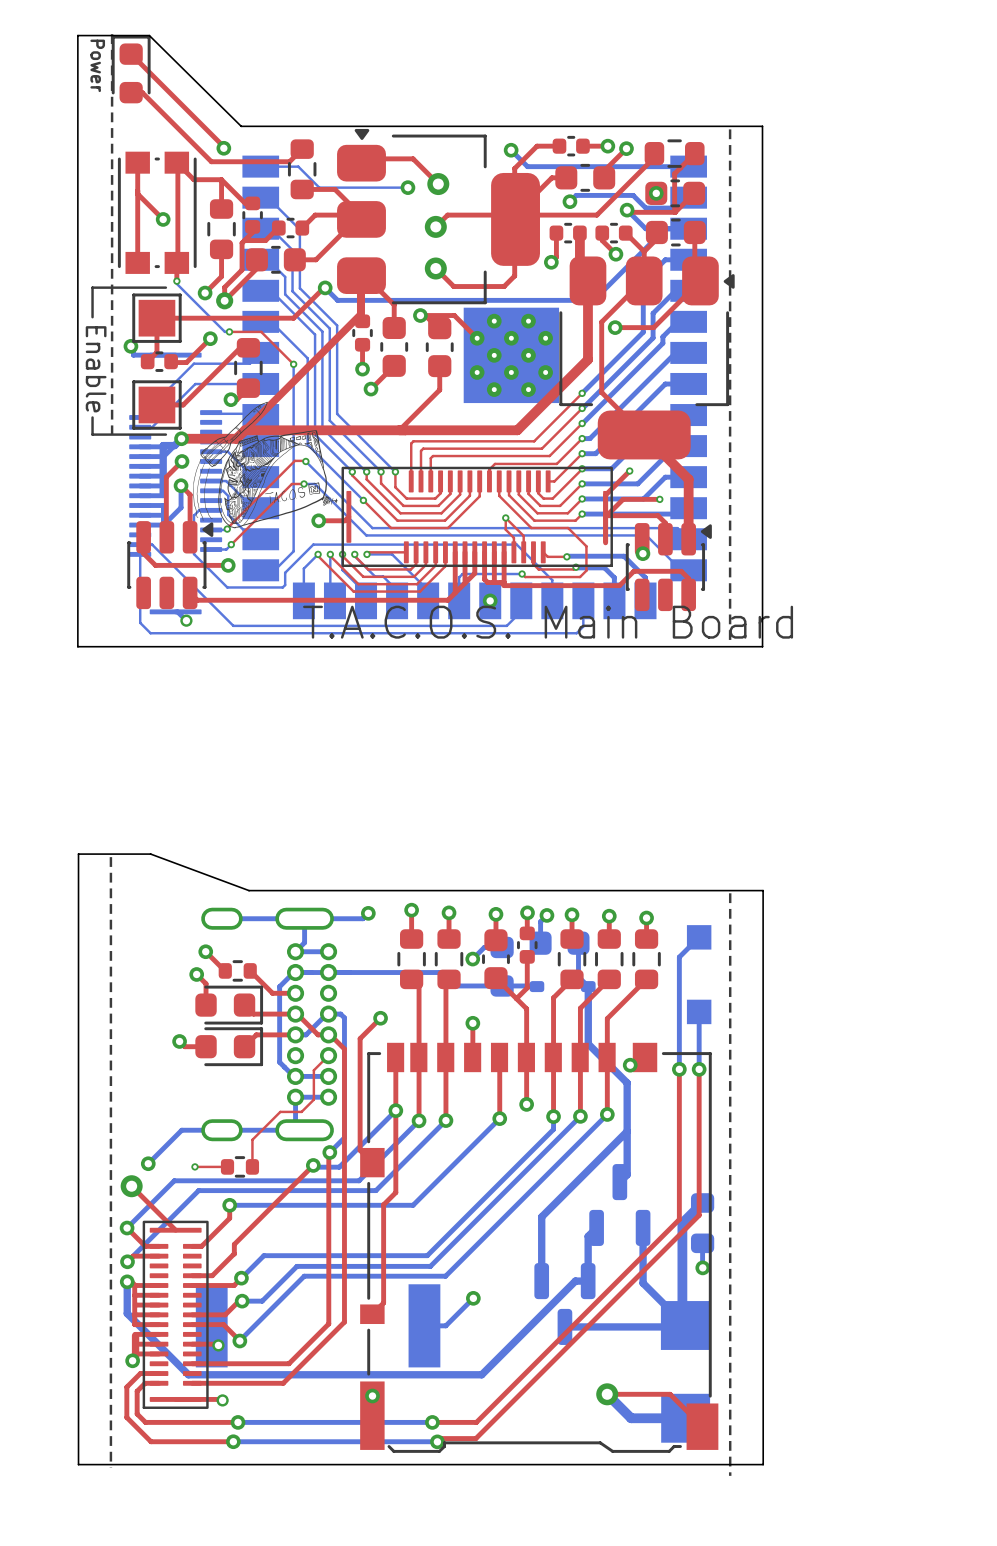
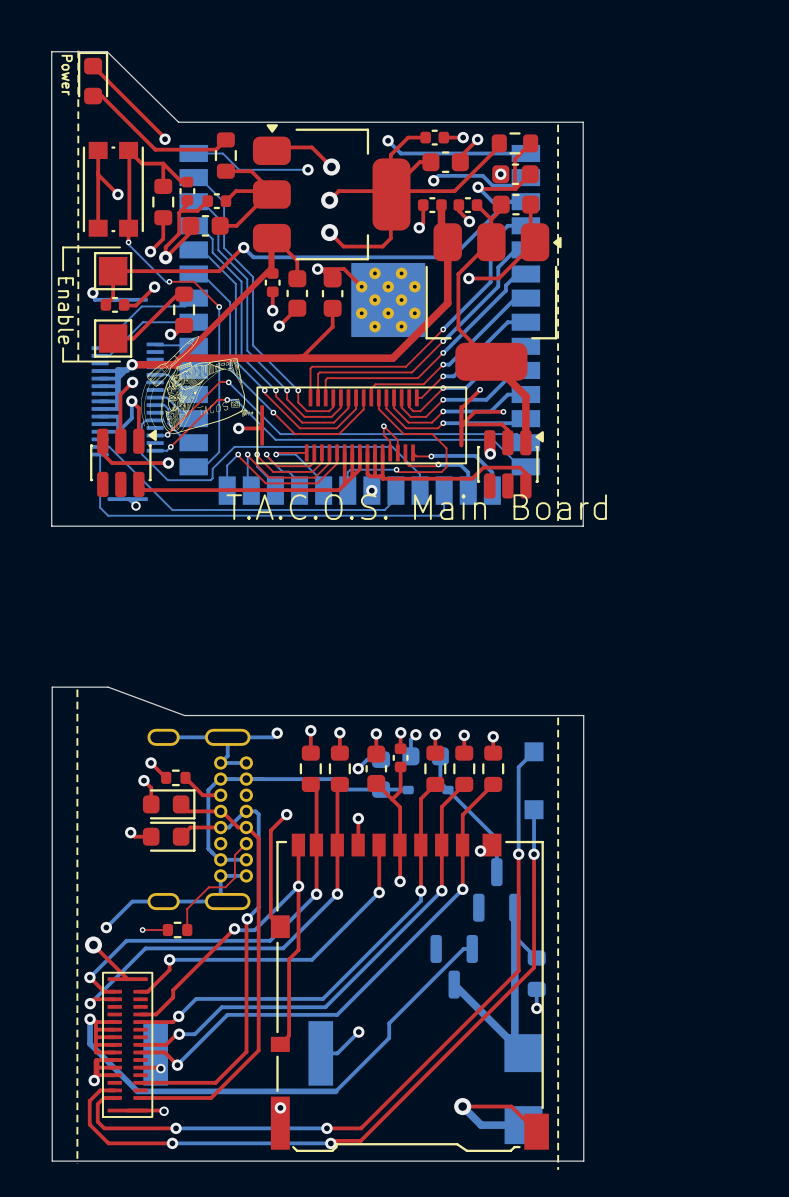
bottom track: (588, 986) (588, 1044) (627, 1082) (627, 1174) (619, 1182) -> (447, 790) (496, 838) (496, 872)
part: none -> (496, 889)
bottom track: (627, 1131) (541, 1216) (541, 1281) -> none
bottom track: none -> (514, 907) (514, 1044)
bottom track: (702, 1202) (682, 1223) (682, 1322) -> (536, 958) (514, 936)
part rotation: 0° (619, 1205) -> 180° (454, 966)
bottom track: (596, 1227) (588, 1236) (588, 1281) (575, 1281) (481, 1374) (443, 1374) -> (472, 948) (463, 948) (389, 1023) (389, 1038) (335, 1091)
bottom track: (643, 1227) (643, 1283) (685, 1325) (564, 1326) -> none
bottom track: none -> (454, 984) (522, 1053)
part: (564, 1304) -> none

